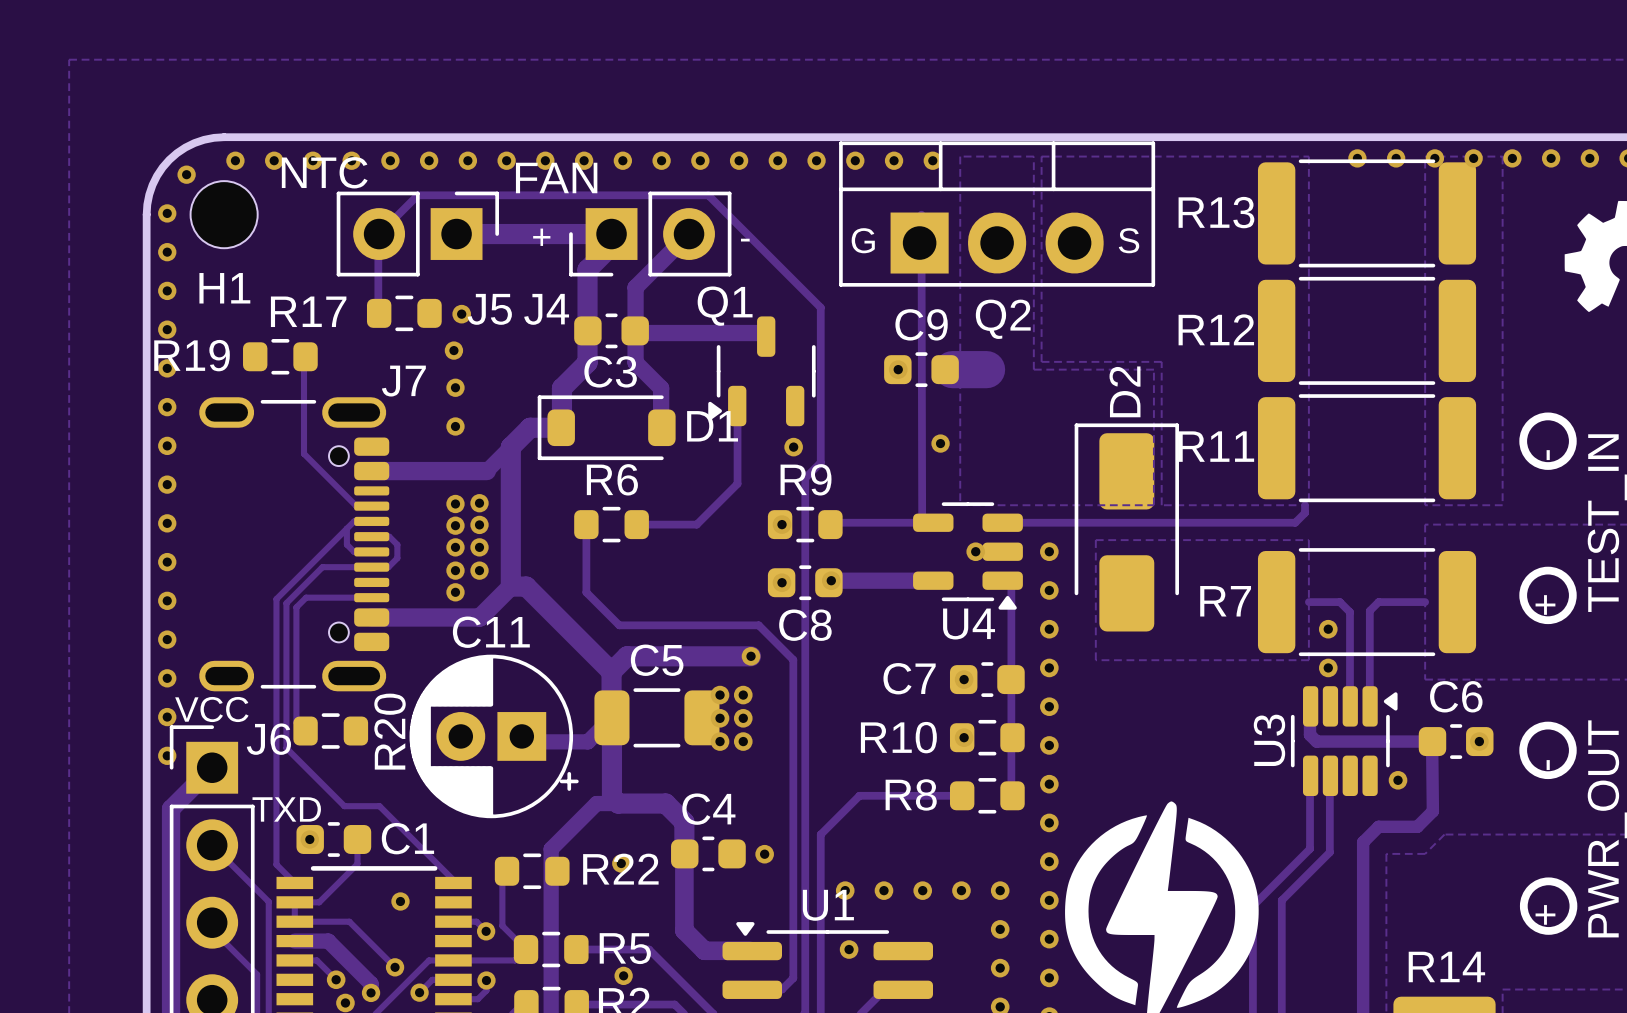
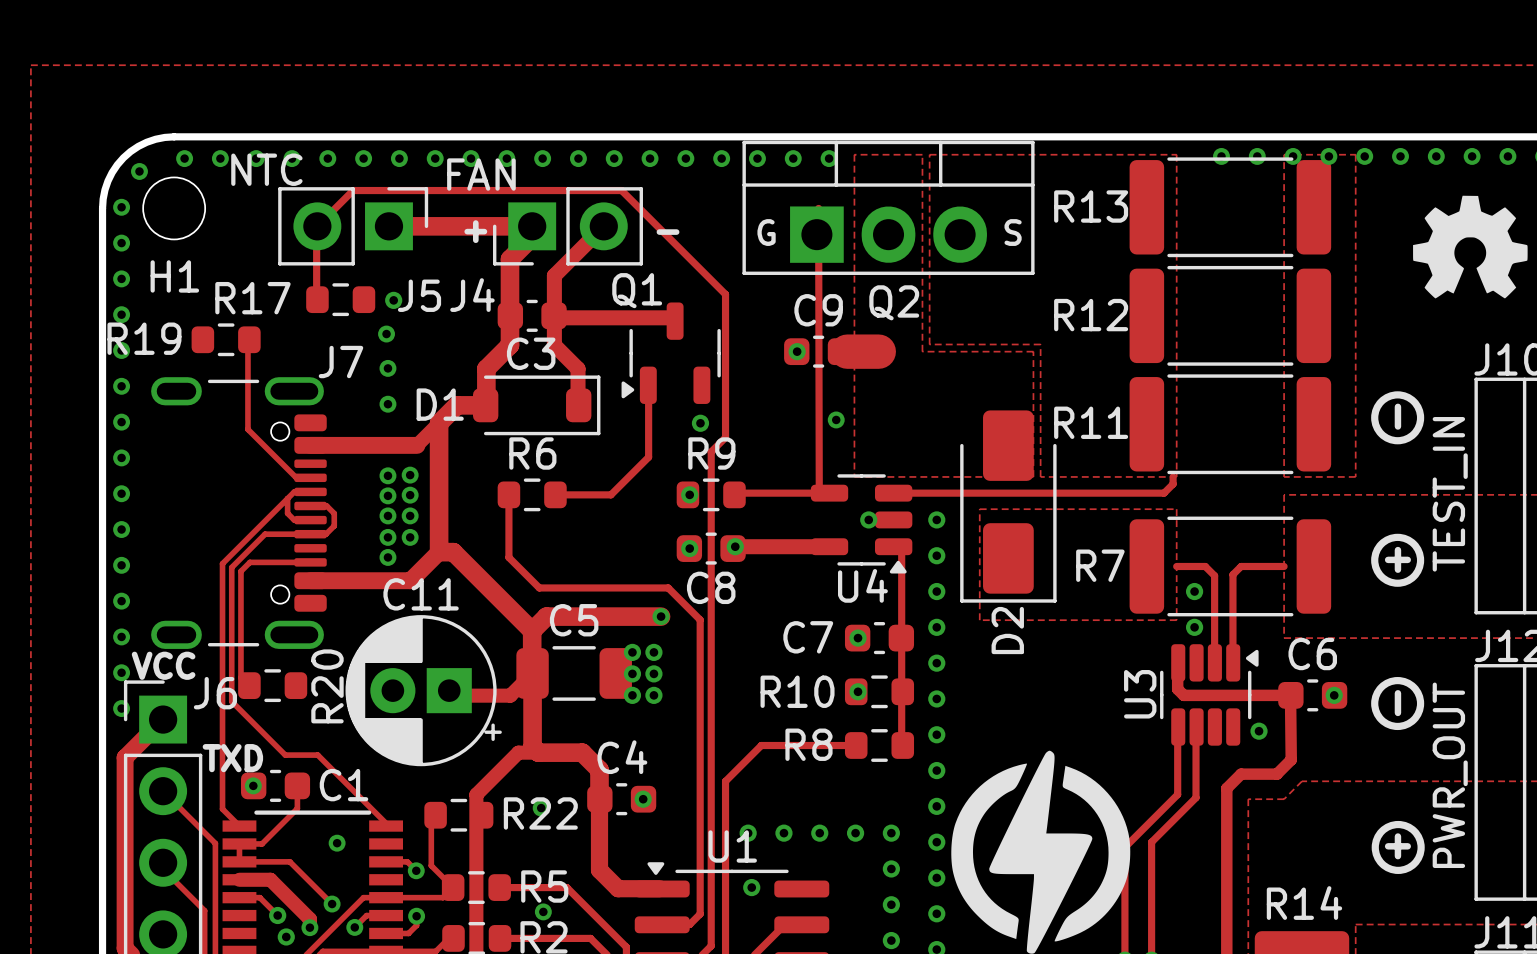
D1 rotation: 0° (606, 427) -> 180° (536, 405)
D2 rotation: 0° (1126, 527) -> 180° (1008, 506)
via position: (764, 854) -> (643, 799)

